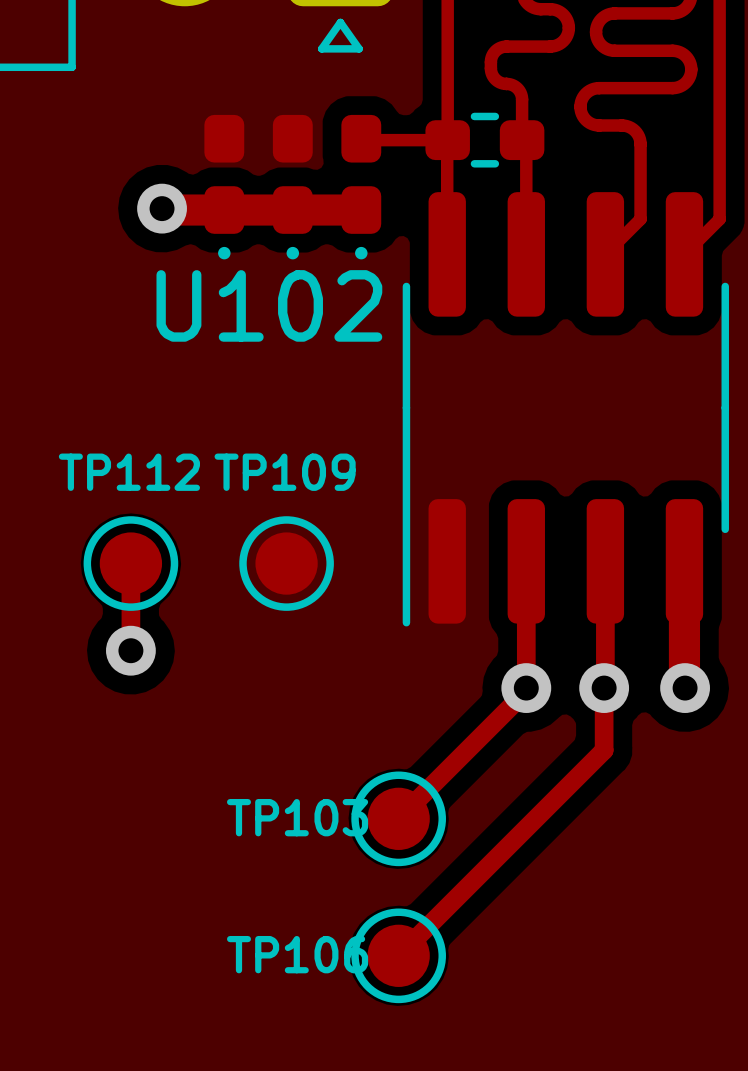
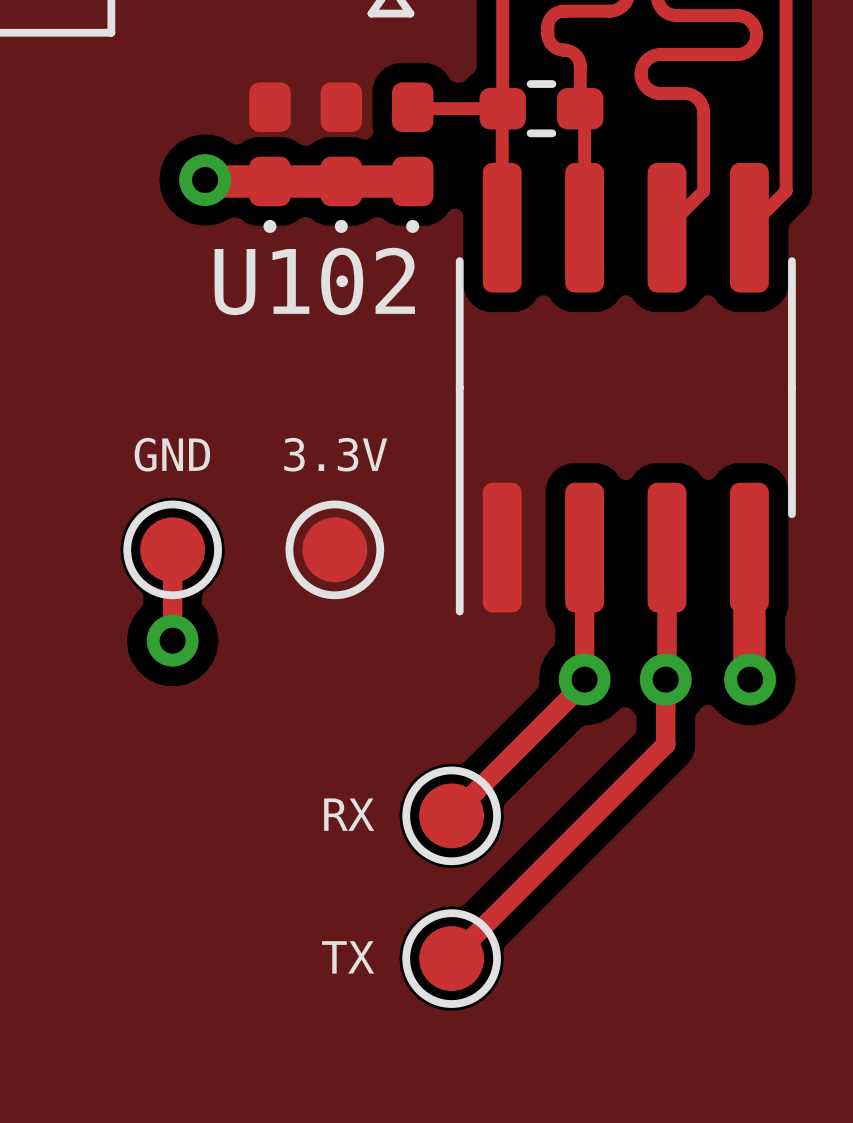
TP112 name: TP112 (129, 472) -> GND (172, 454)
TP109 name: TP109 (285, 472) -> 3.3V (335, 454)
TP103 name: TP103 (297, 817) -> RX (349, 814)
TP106 name: TP106 (297, 954) -> TX (348, 957)

